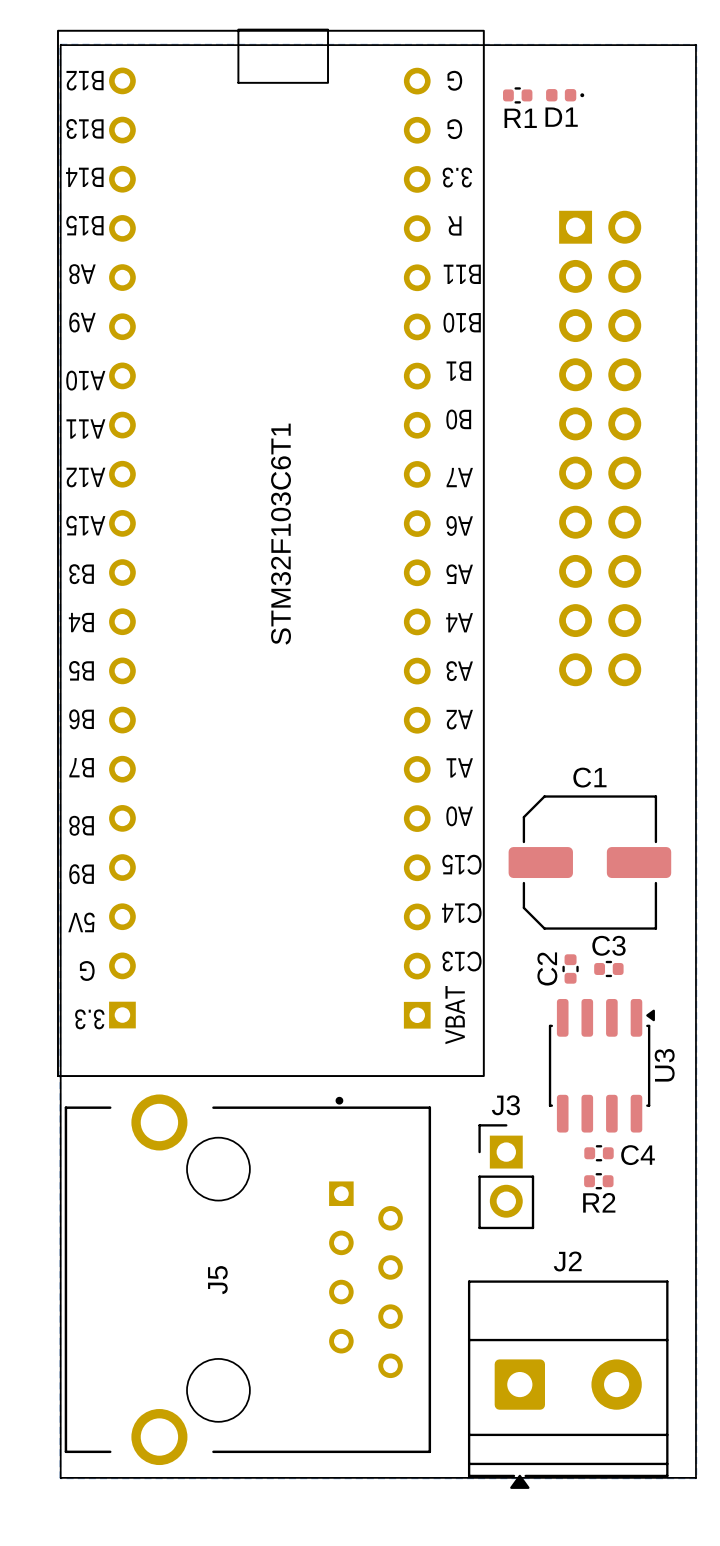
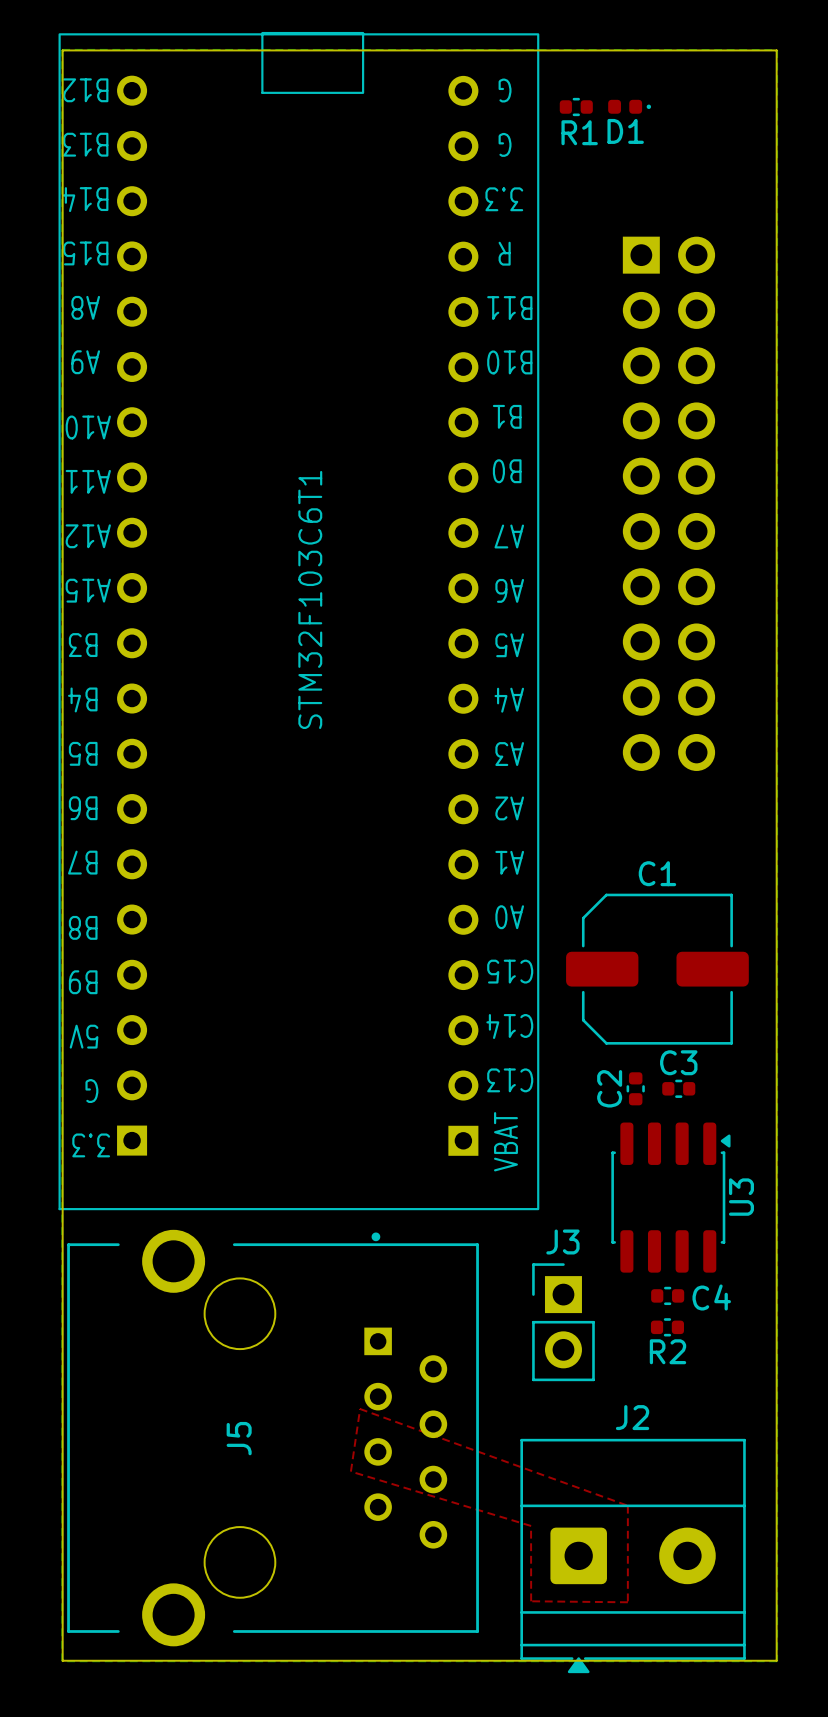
top zone outline: none -> (359, 1408) (627, 1505) (627, 1602) (531, 1601) (531, 1525) (350, 1471) (359, 1408)

